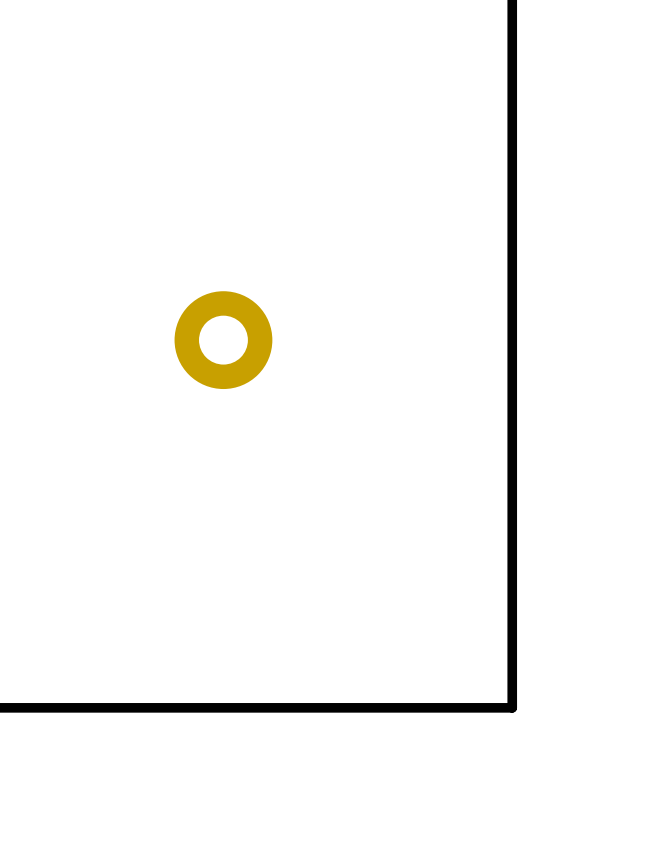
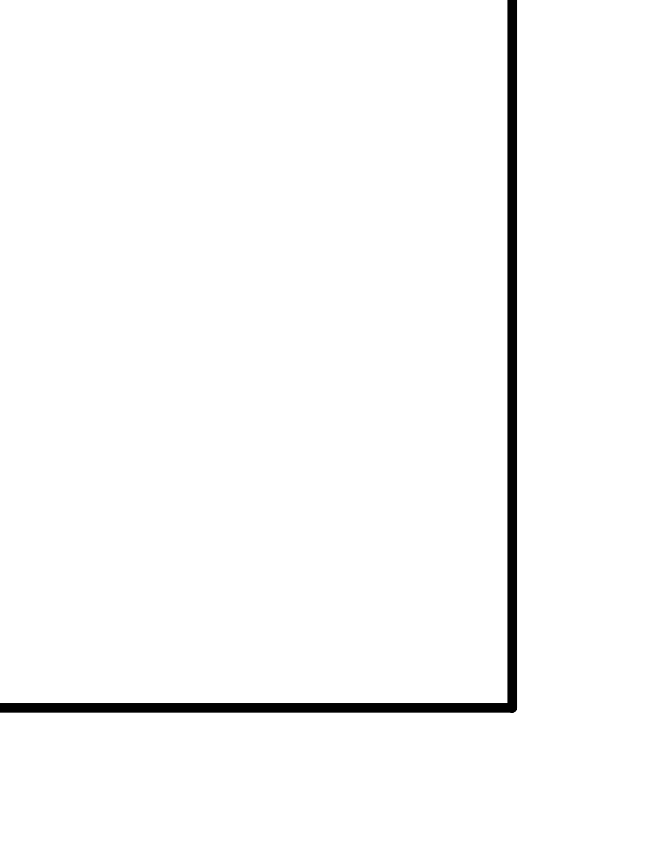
part: (223, 340) -> none

